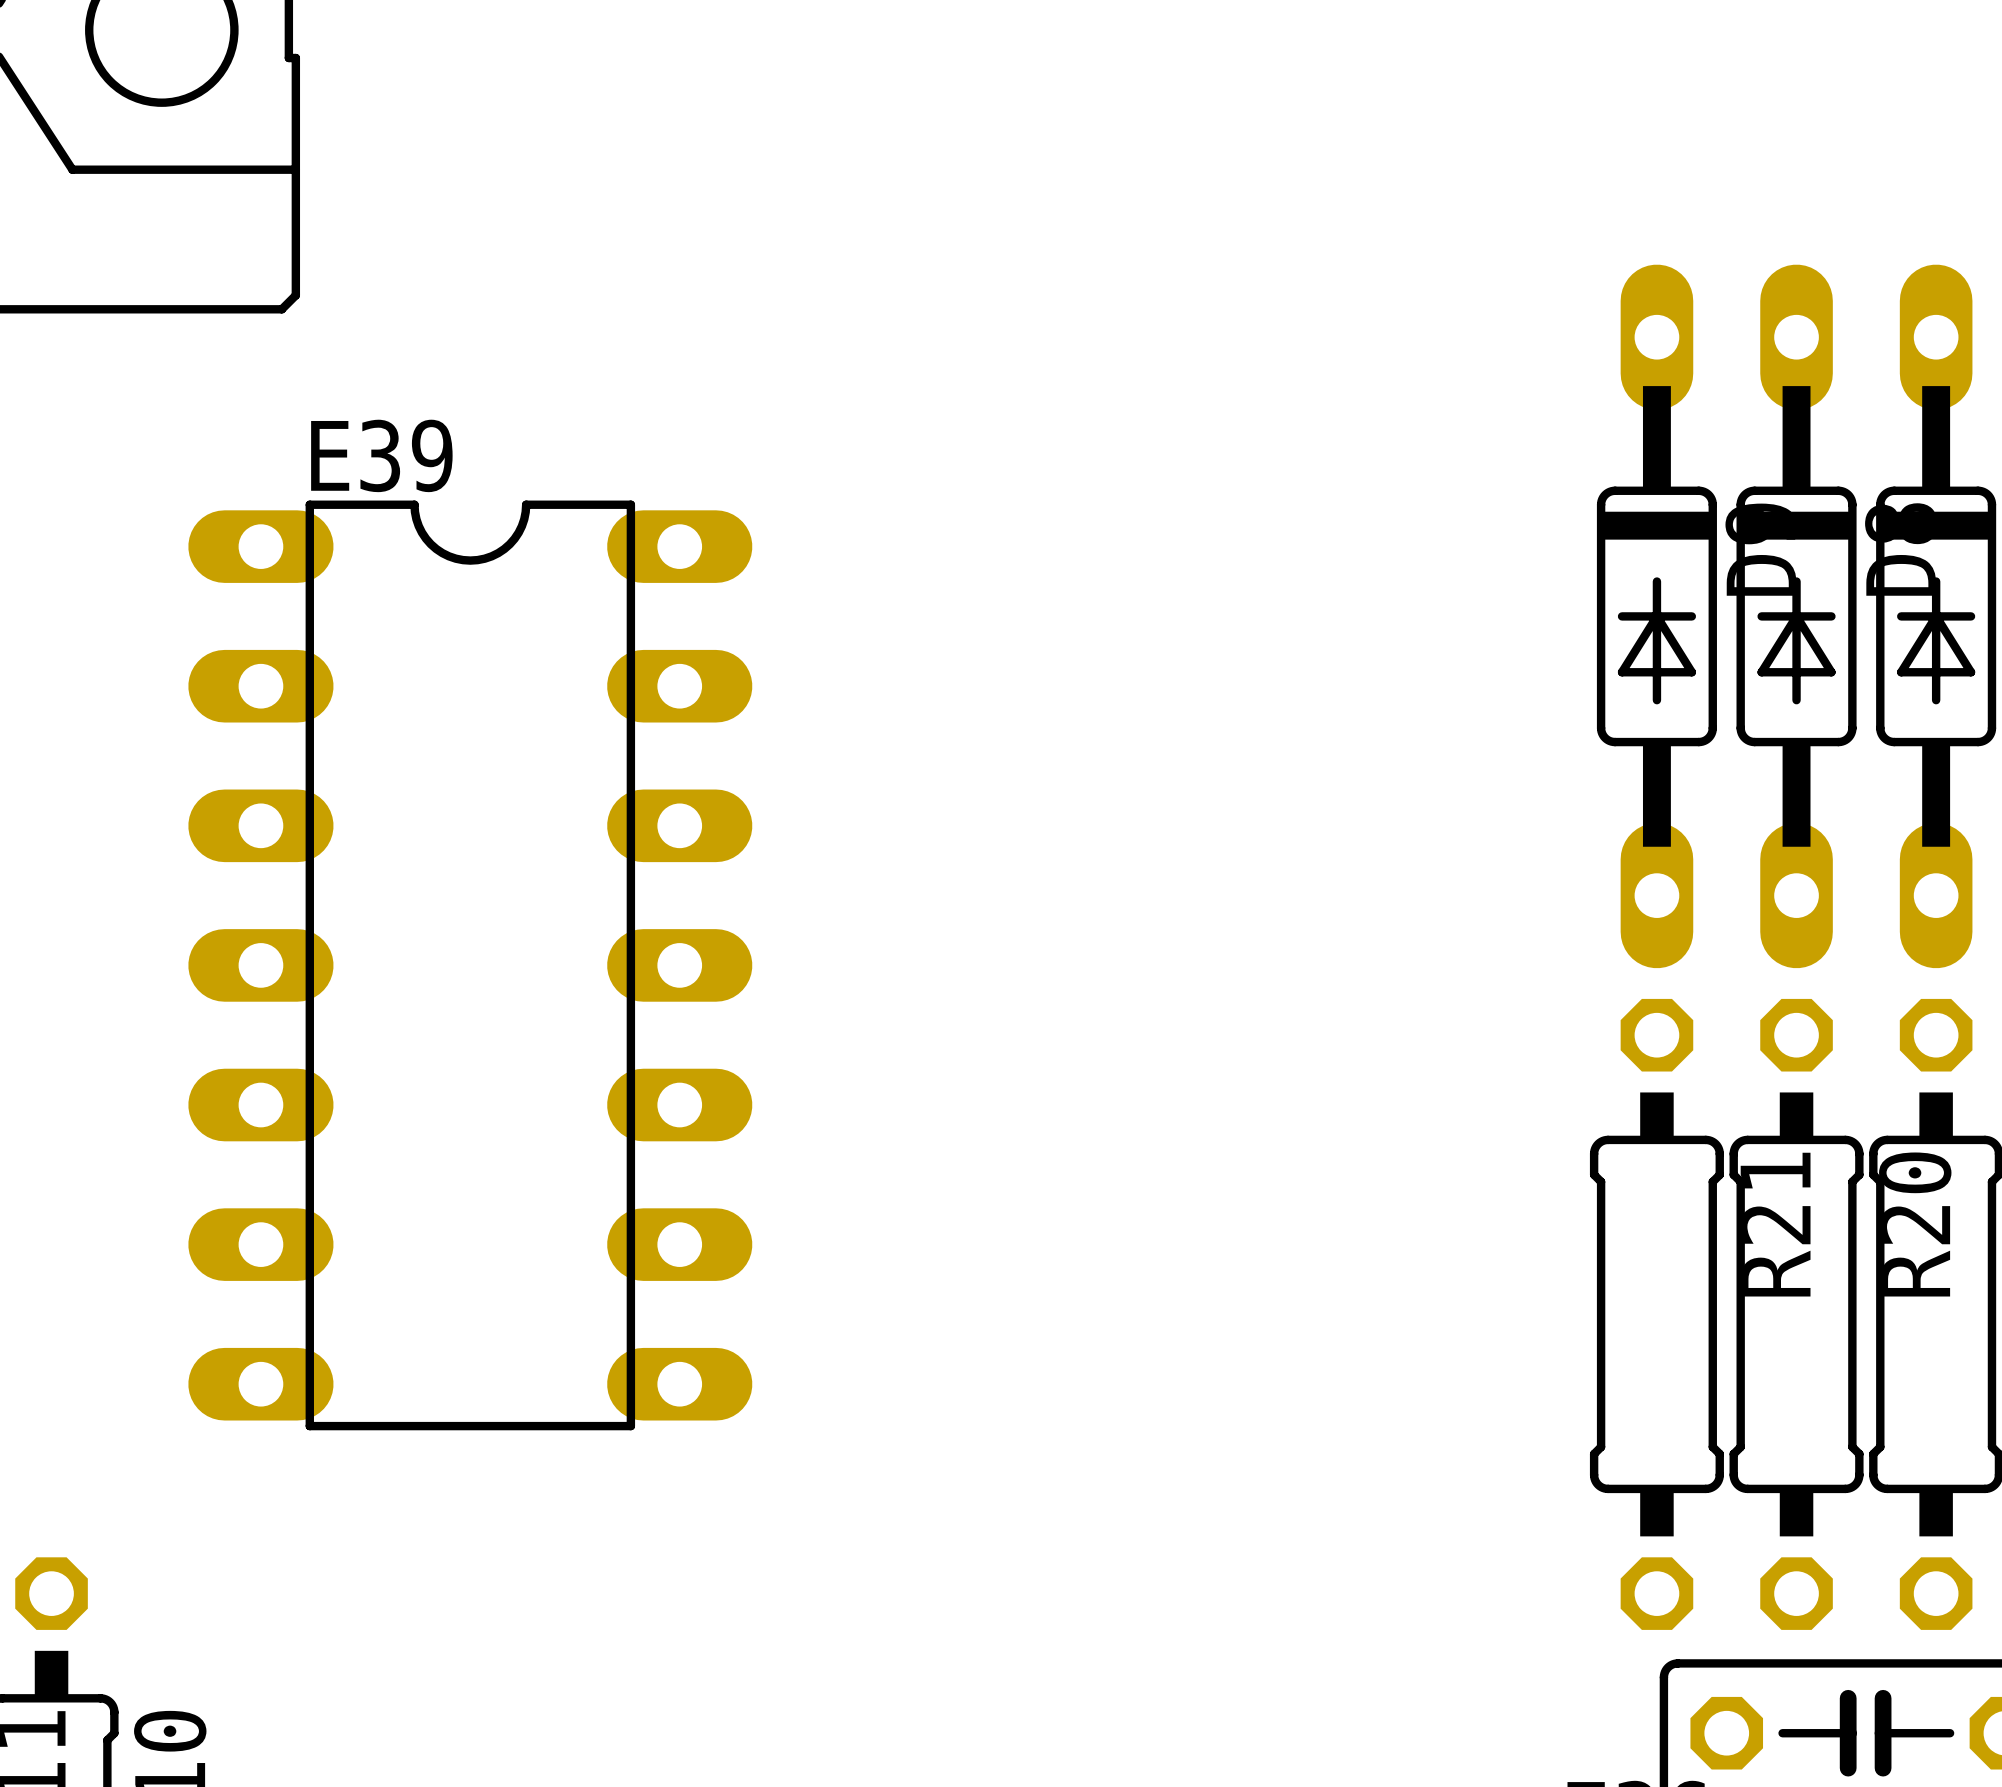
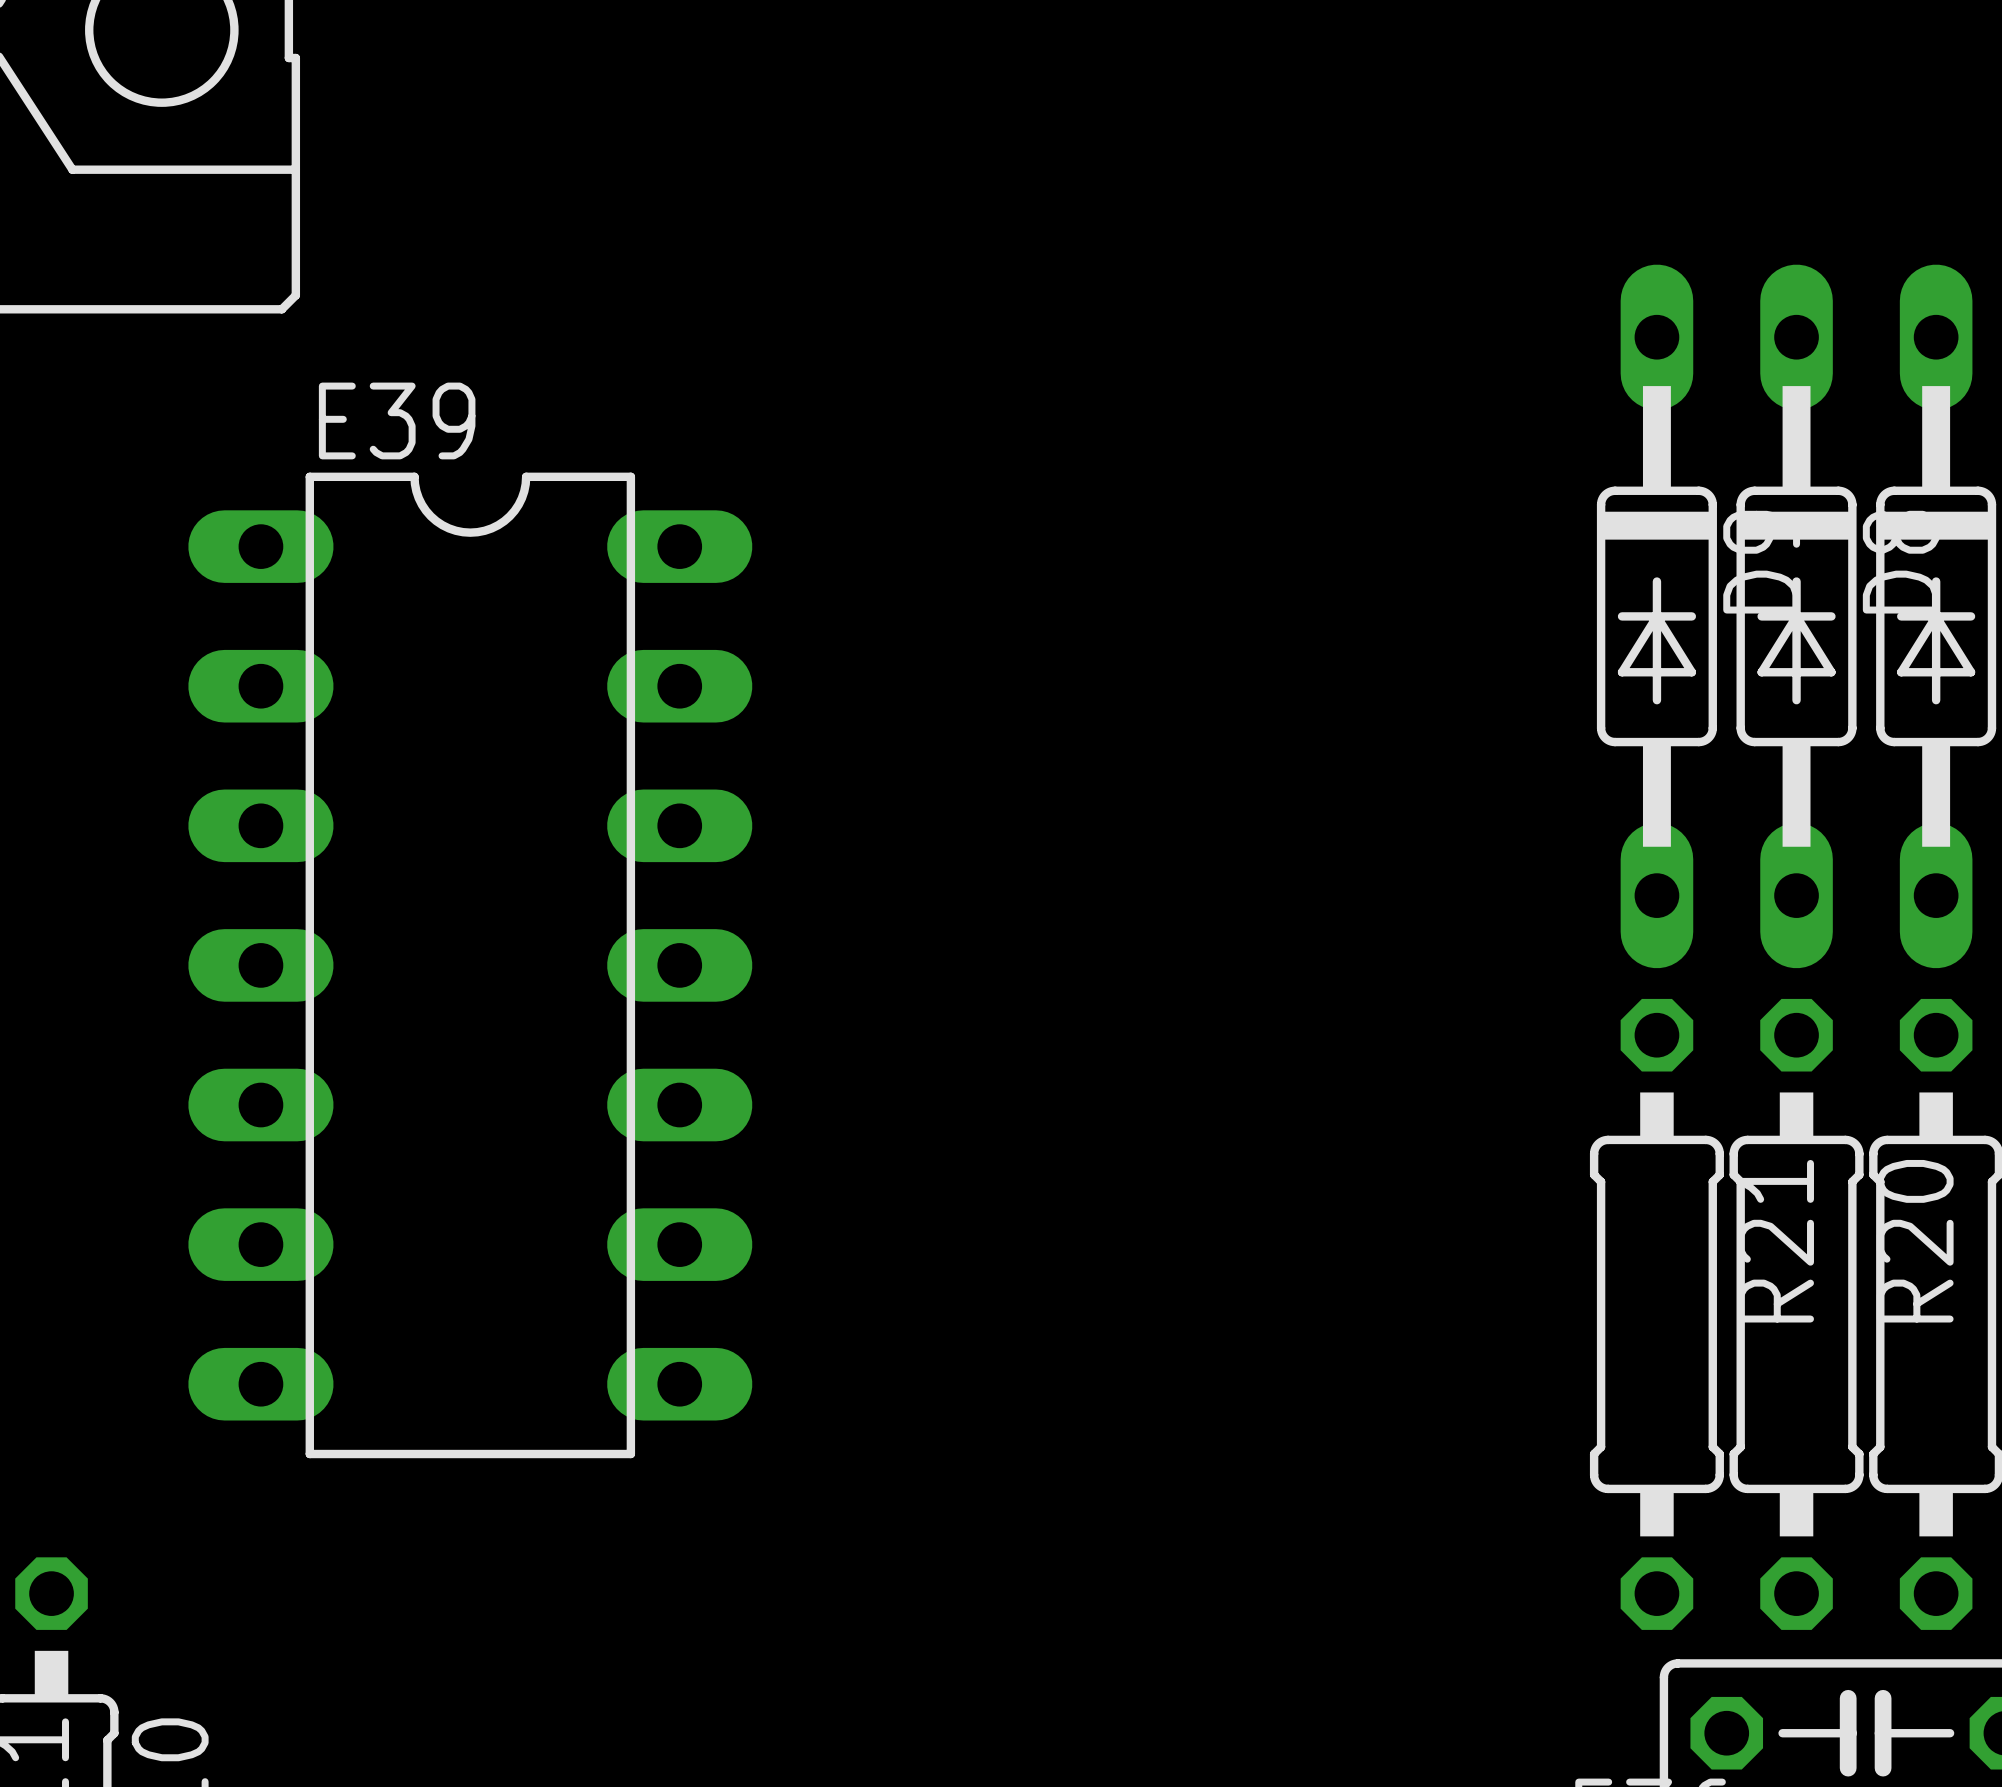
E39 name position: E39 (381, 455) -> E39 (397, 420)
E39 footprint: [188, 500, 753, 1431] -> [188, 472, 753, 1459]

